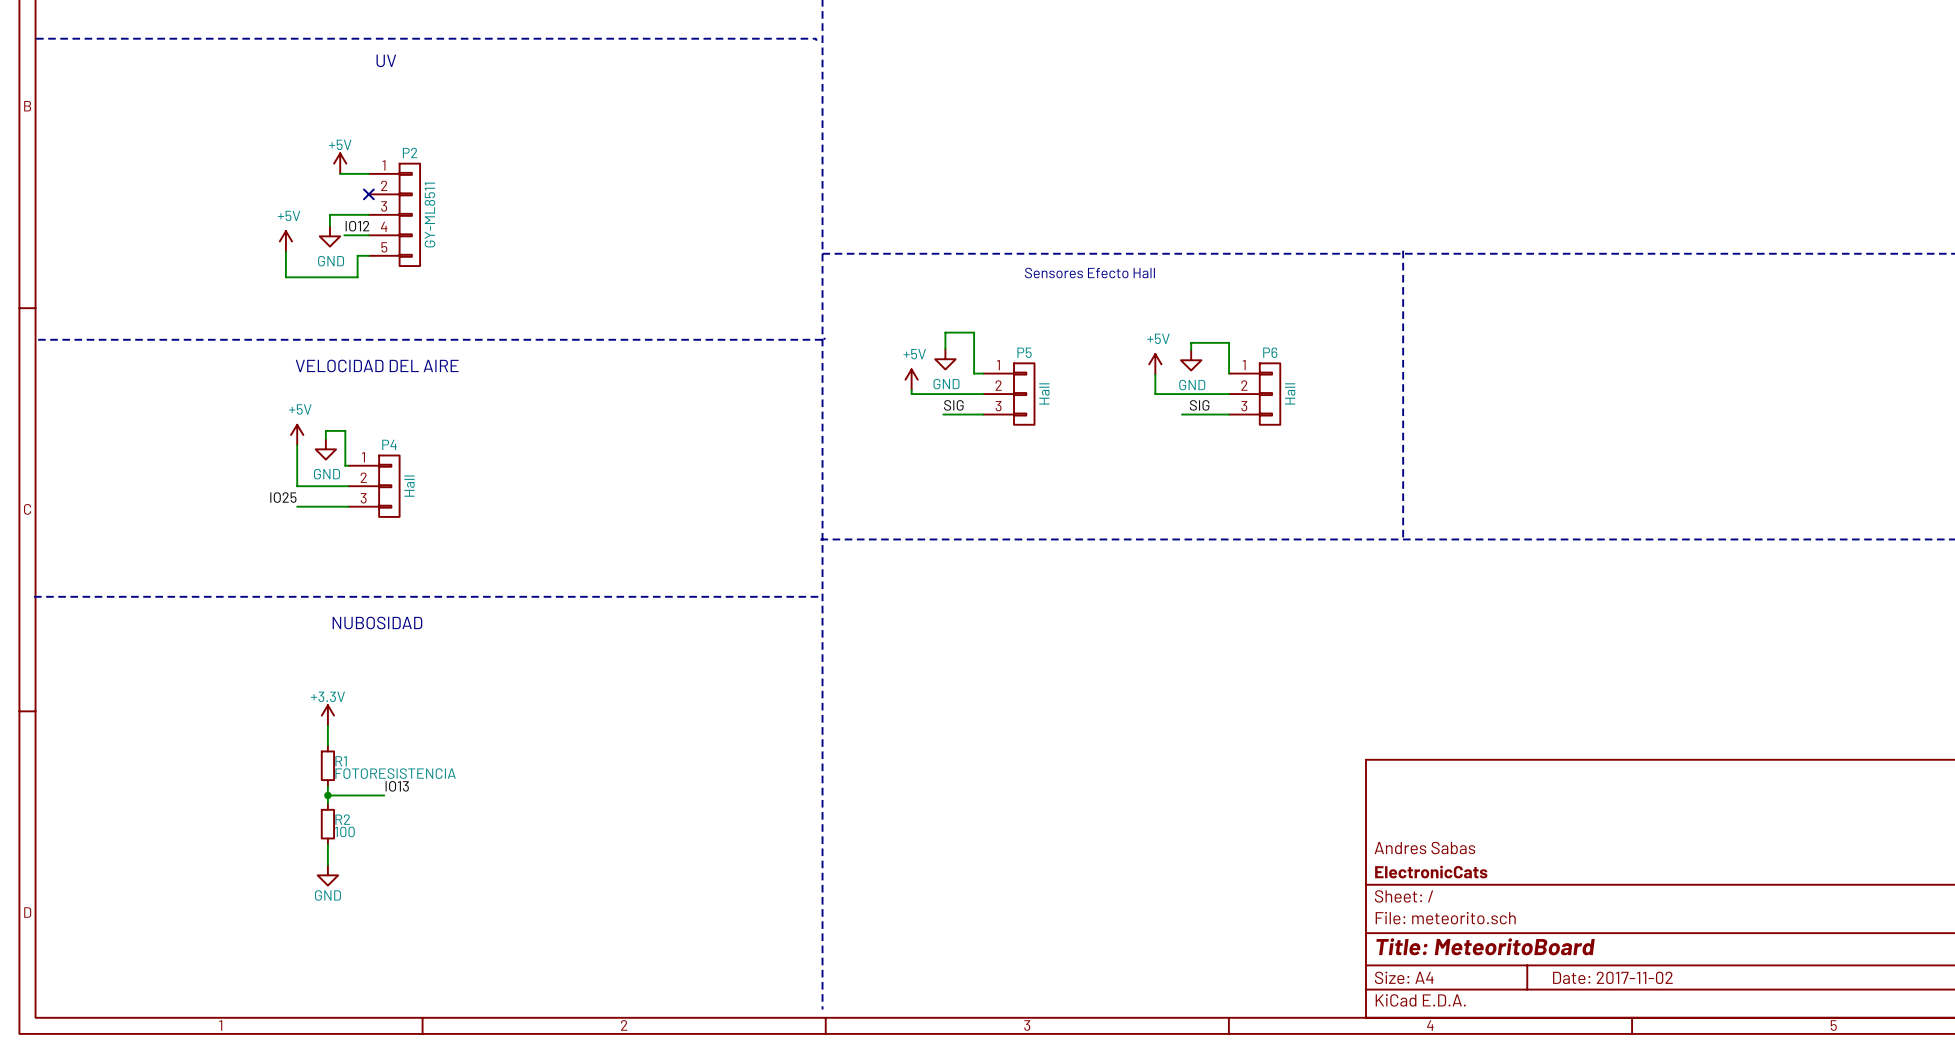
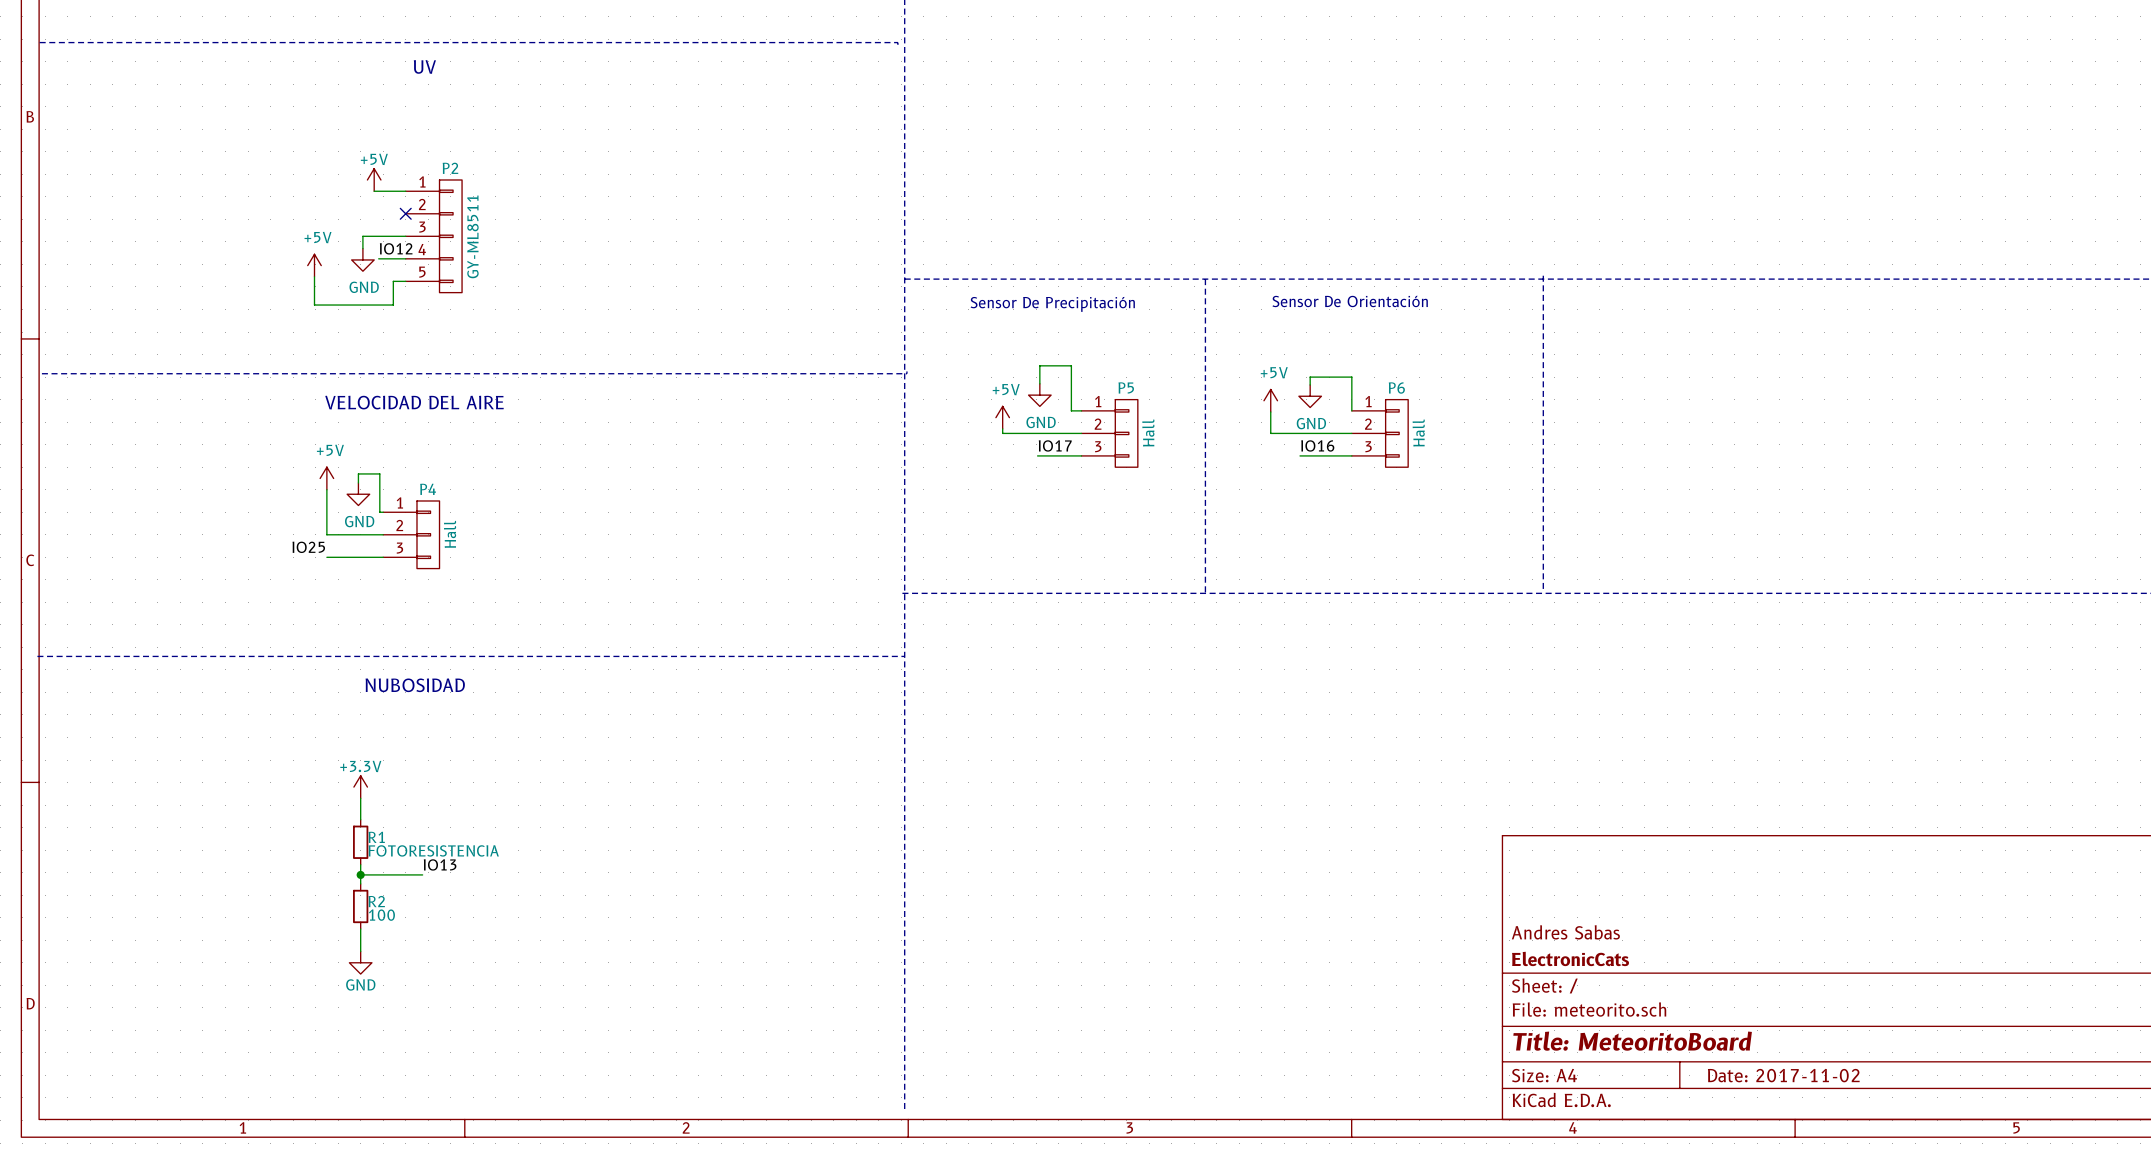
line: none -> (1205, 279) (1205, 593)
text: Sensores Efecto Hall (1089, 273) -> none
text: none -> Sensor De Orientación (1350, 301)
text: none -> Sensor De Precipitación (1052, 304)
label: SIG (953, 405) -> IO17 (1055, 445)
label: SIG (1199, 405) -> IO16 (1317, 445)

